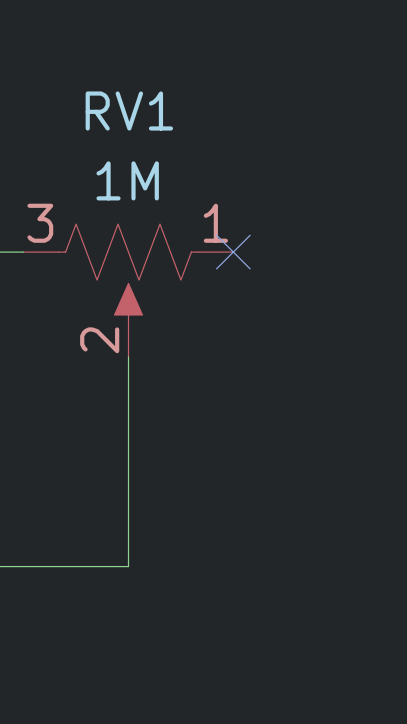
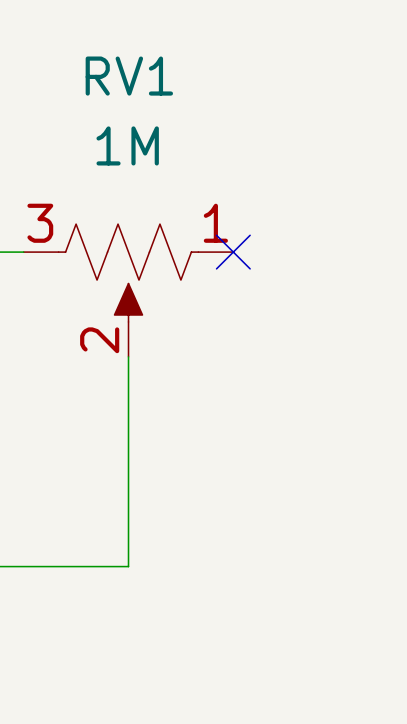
RV1 name position: RV1 (129, 111) -> RV1 (129, 76)
RV1 value position: 1M (127, 180) -> 1M (127, 145)

